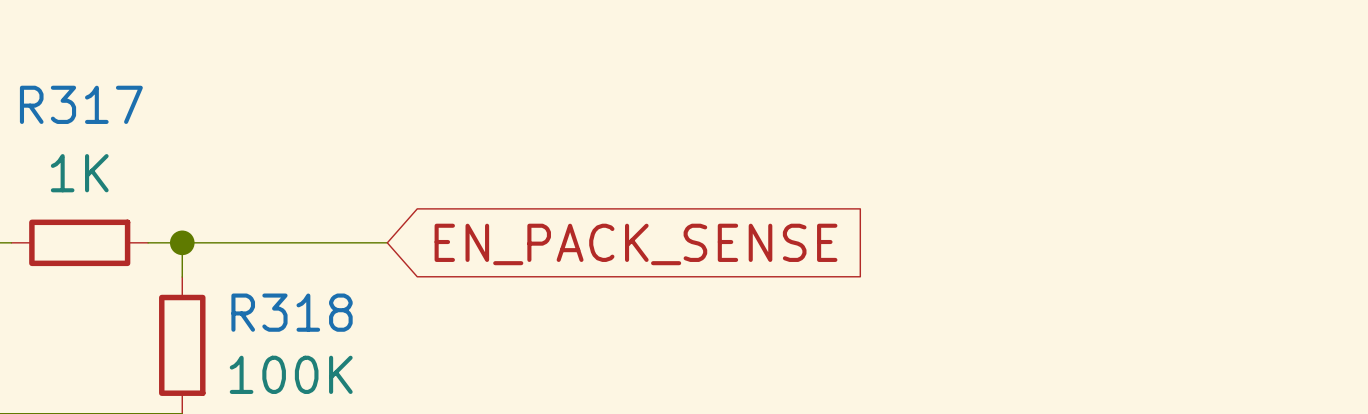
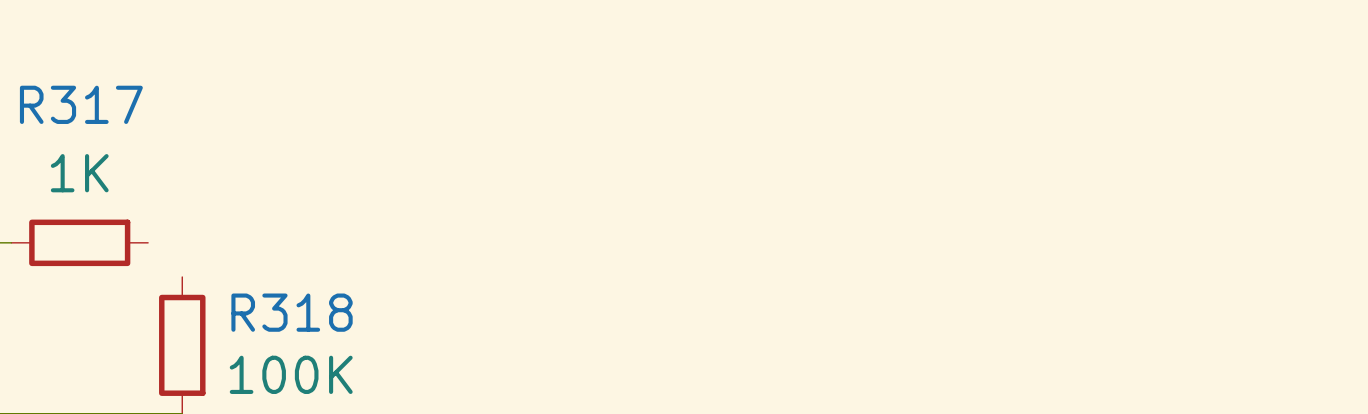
wire: (148, 242) (387, 242) -> none
wire: (182, 242) (182, 277) -> none
junction: (182, 242) -> none
global label: EN_PACK_SENSE (636, 244) -> none

